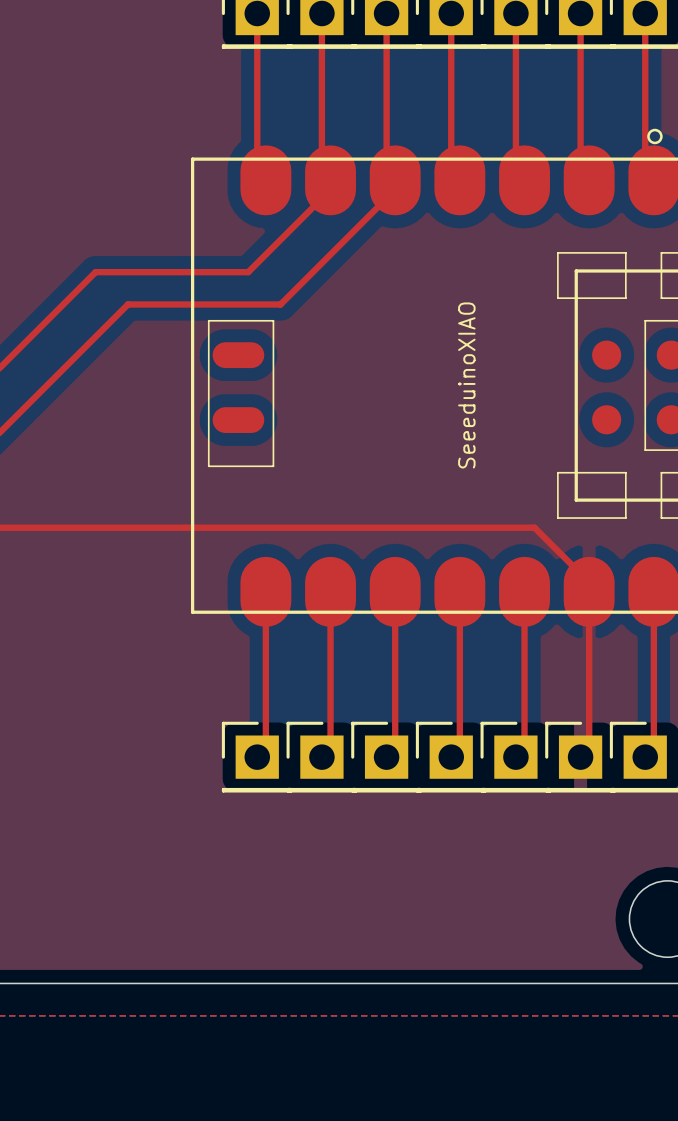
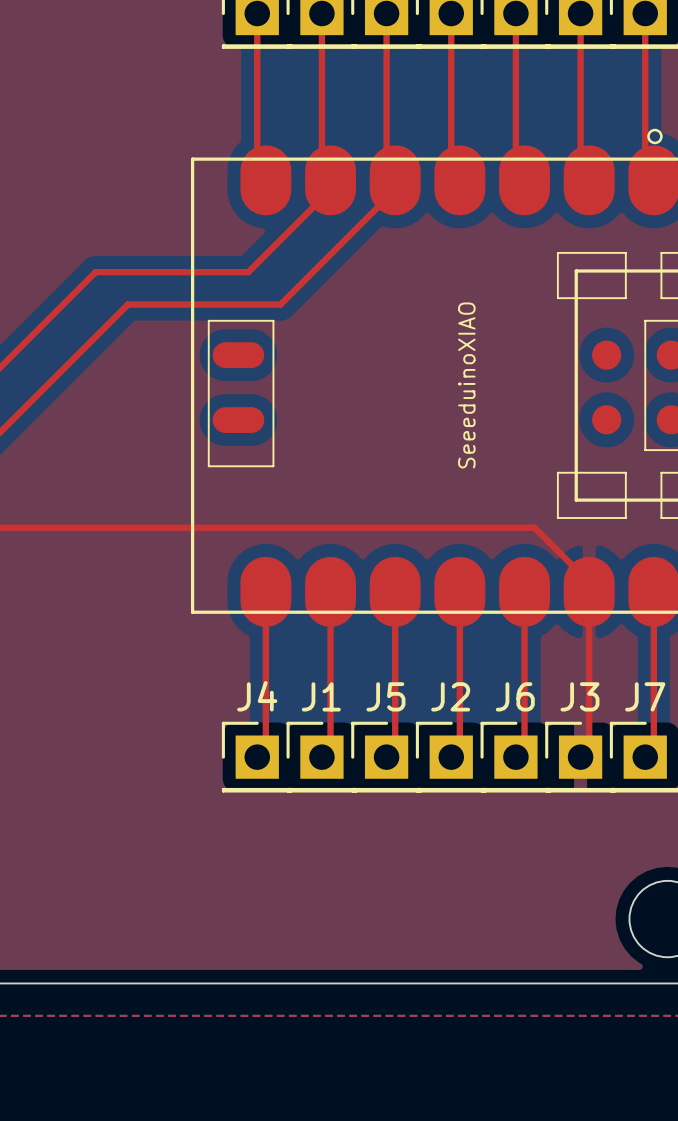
J4 name: none -> J4 (257, 696)
J1 name: none -> J1 (321, 696)
J5 name: none -> J5 (385, 696)
J2 name: none -> J2 (450, 696)
J6 name: none -> J6 (515, 696)
J3 name: none -> J3 (579, 696)
J7 name: none -> J7 (645, 696)

